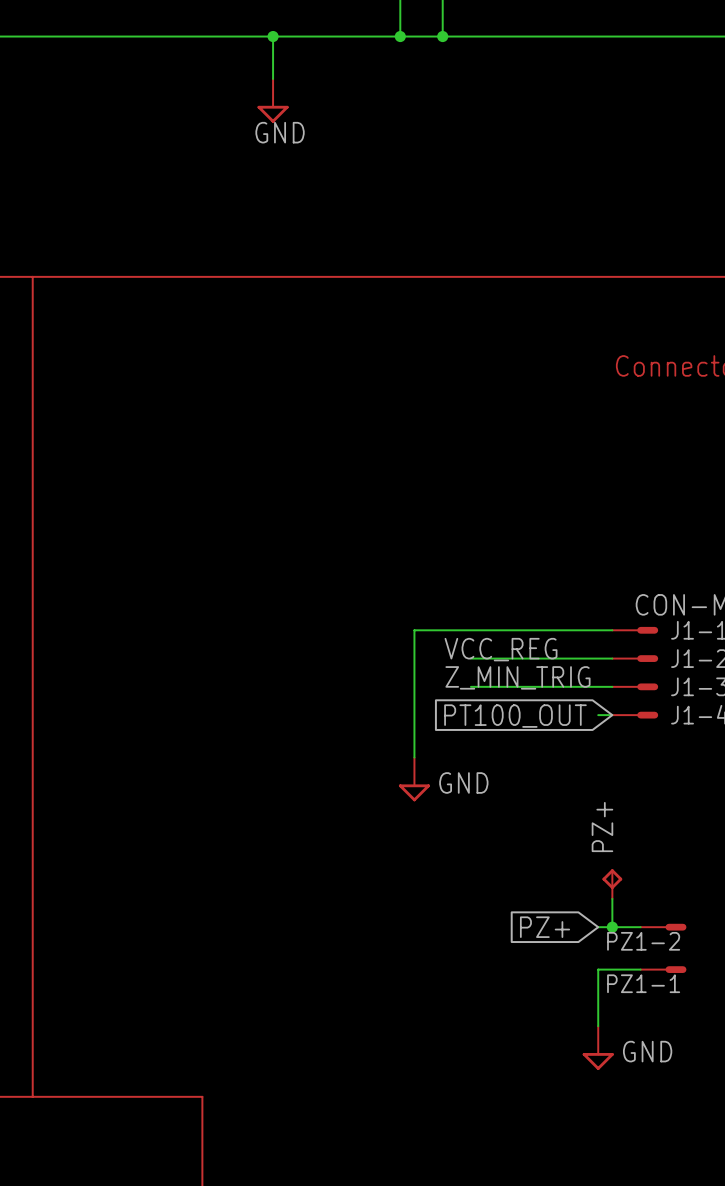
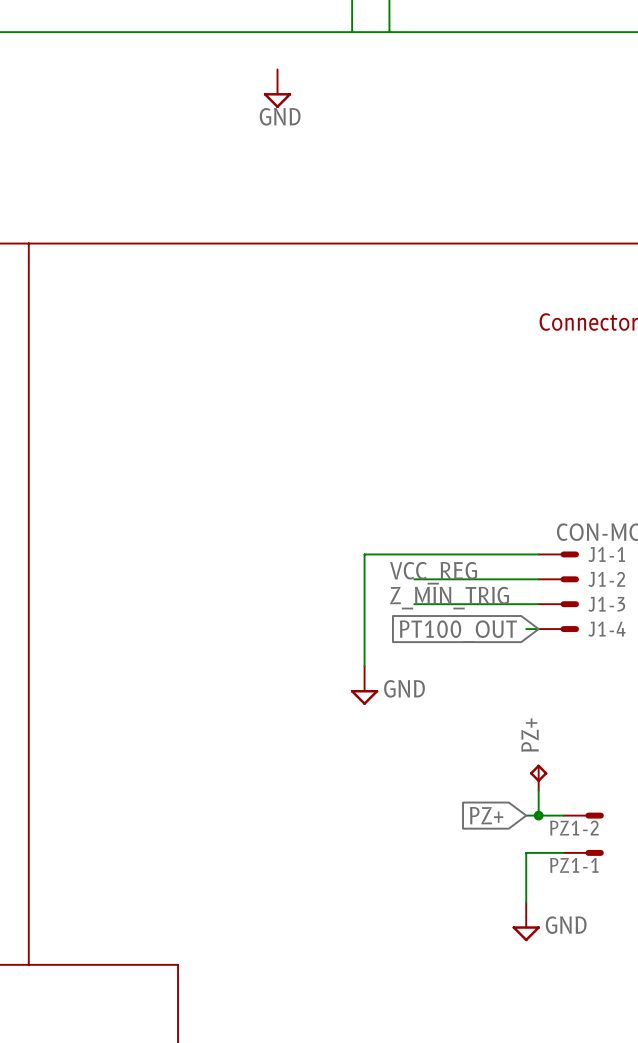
wire: (273, 36) (273, 78) -> none
junction: (273, 36) -> none
junction: (400, 36) -> none
junction: (442, 36) -> none
power symbol position: GND (273, 100) -> GND (277, 88)

